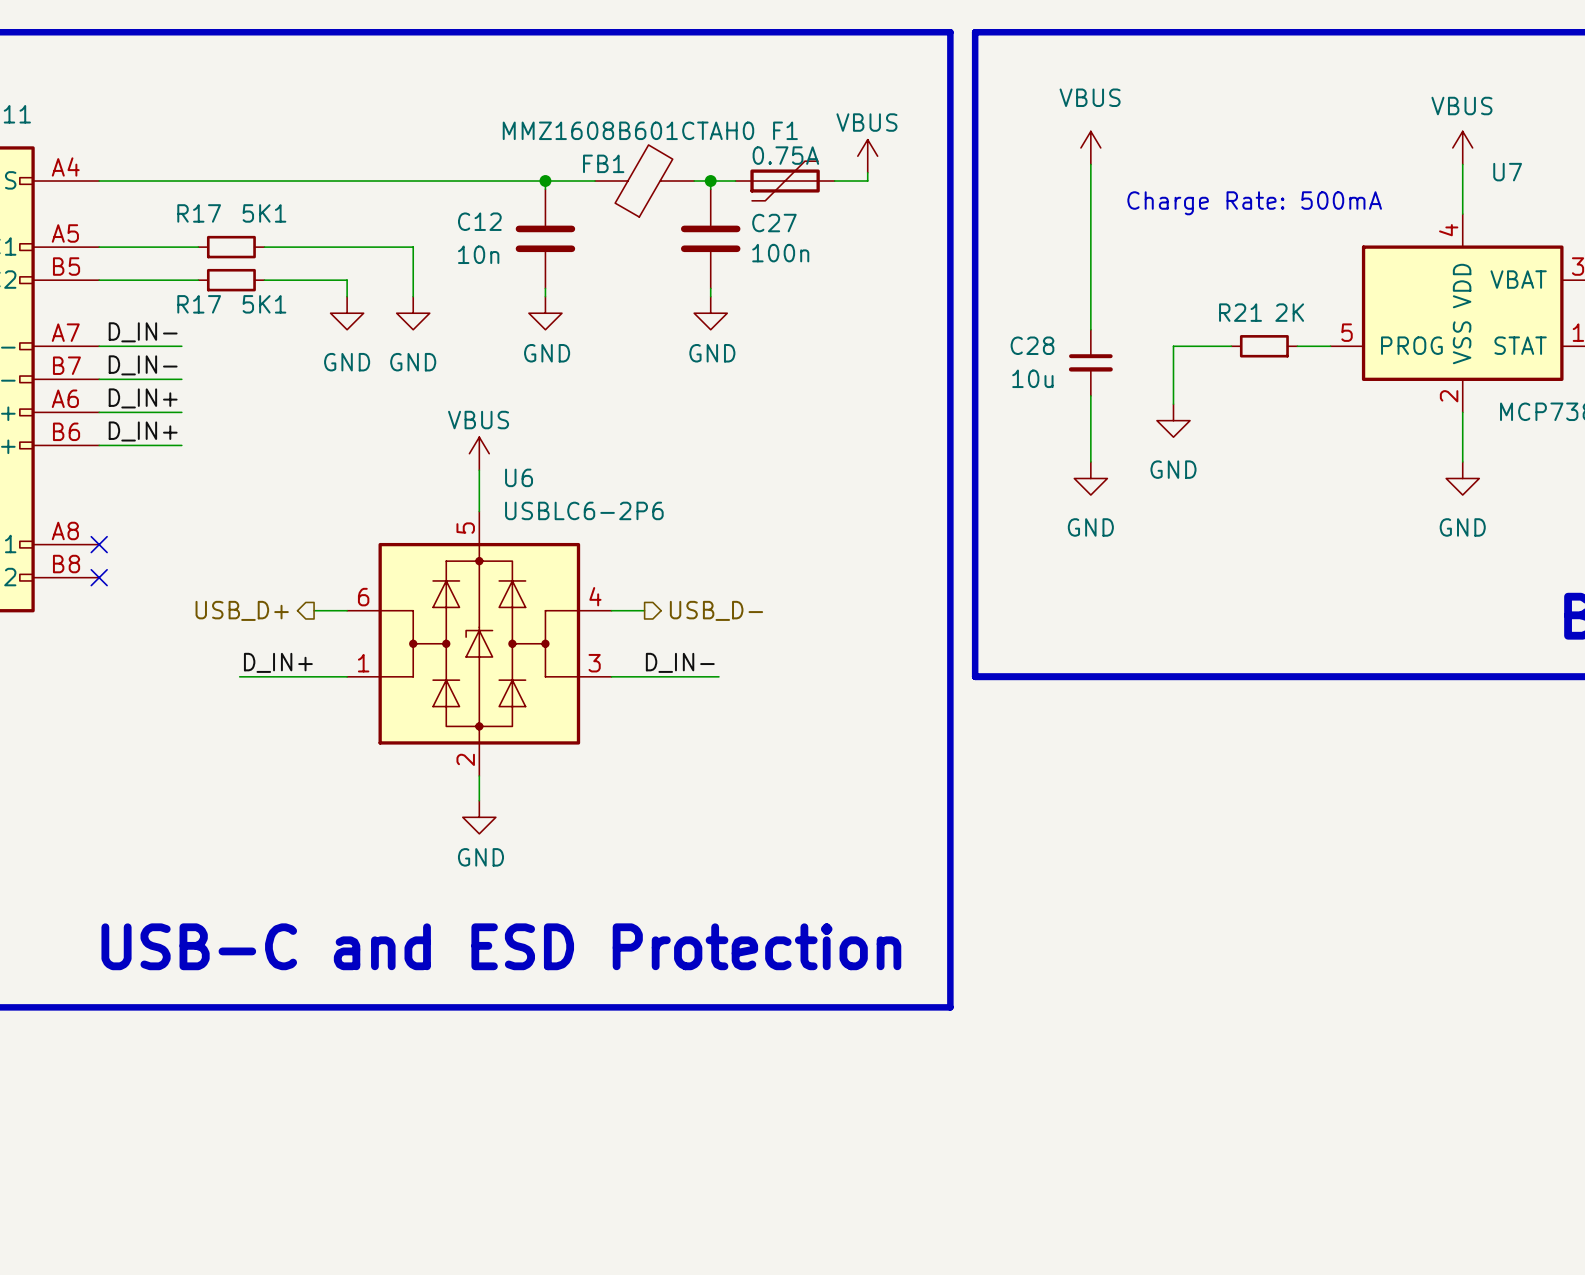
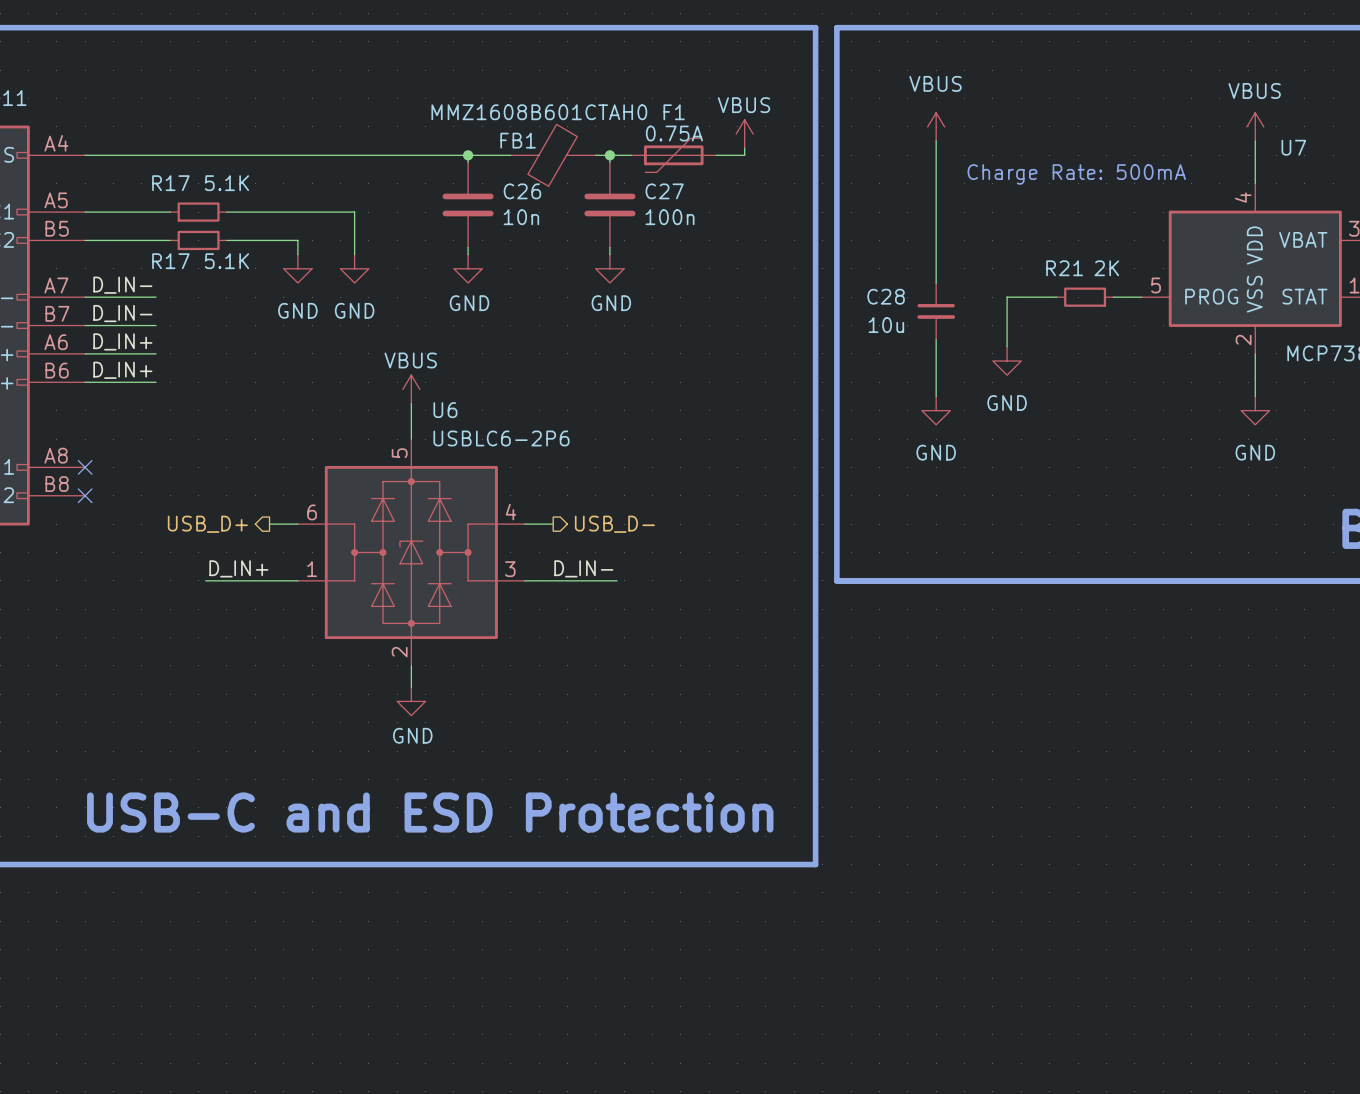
R17 value: 5K1 (264, 213) -> 5.1K (226, 183)
C12 name: C12 (479, 221) -> C26 (522, 191)
C12 value position: 10n (478, 254) -> 10n (521, 217)
R17 value: 5K1 (264, 304) -> 5.1K (226, 261)

